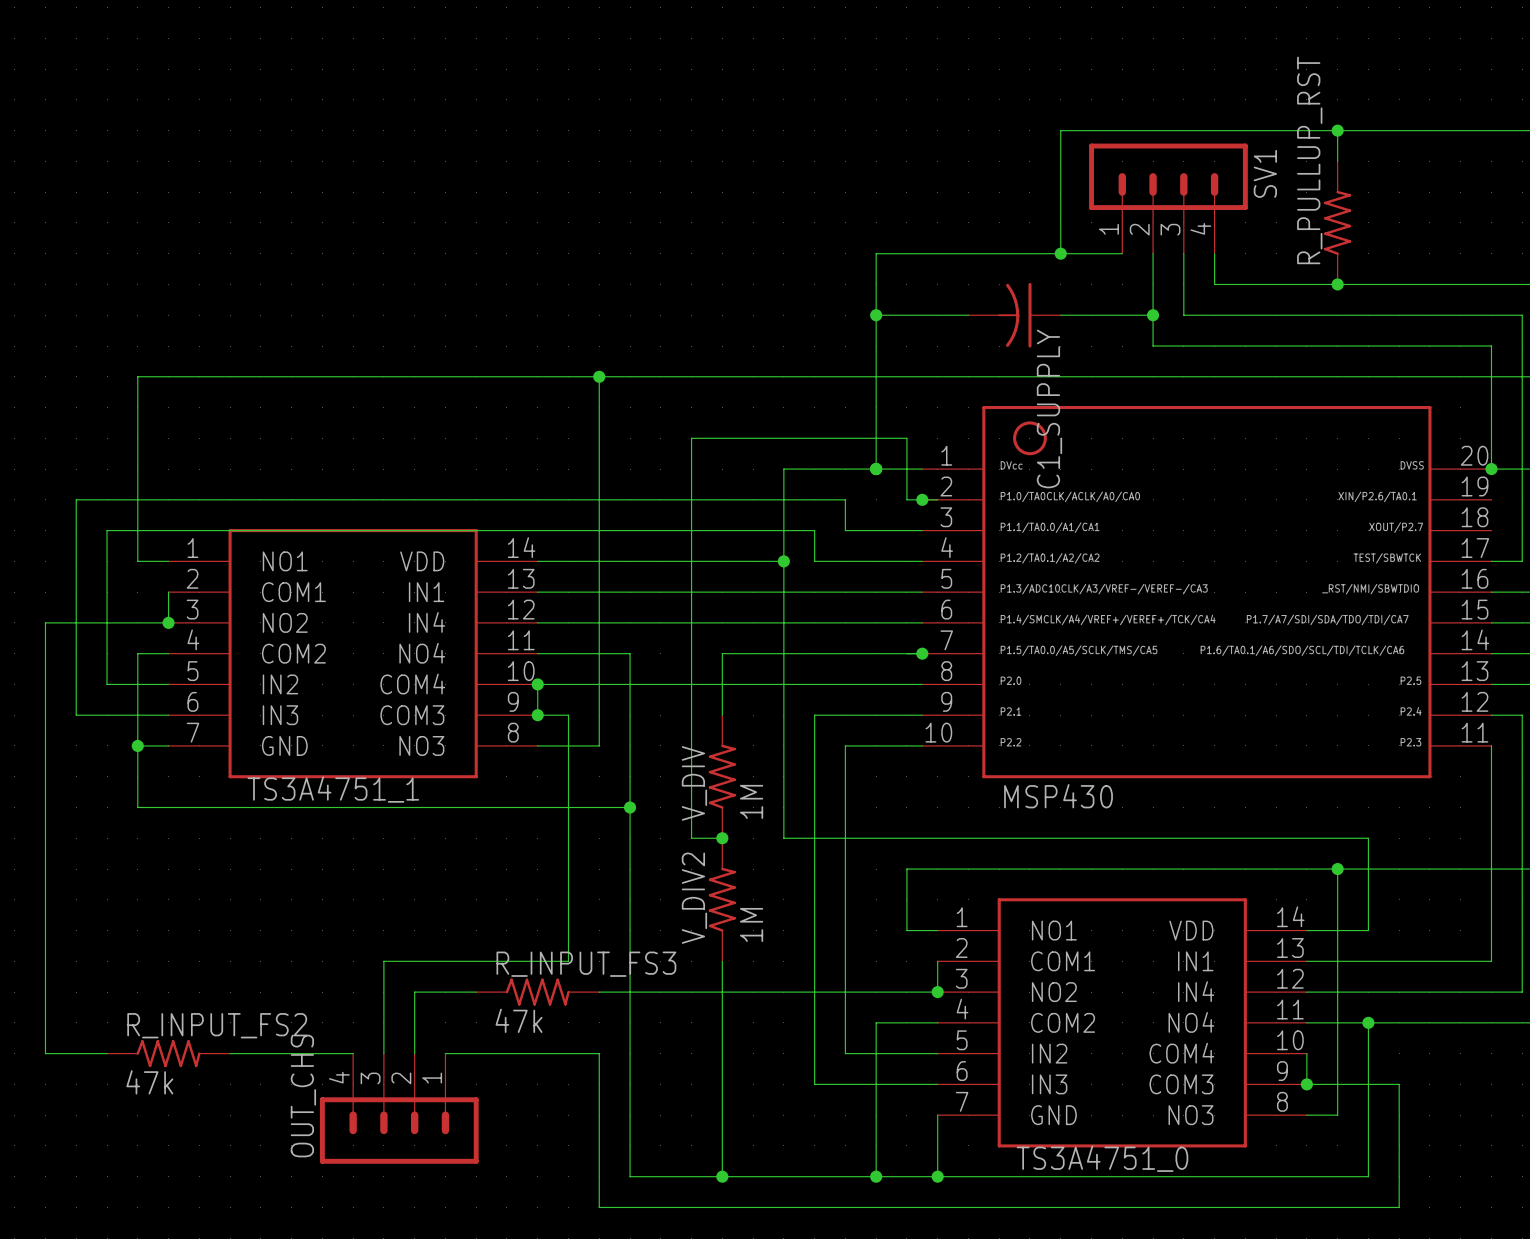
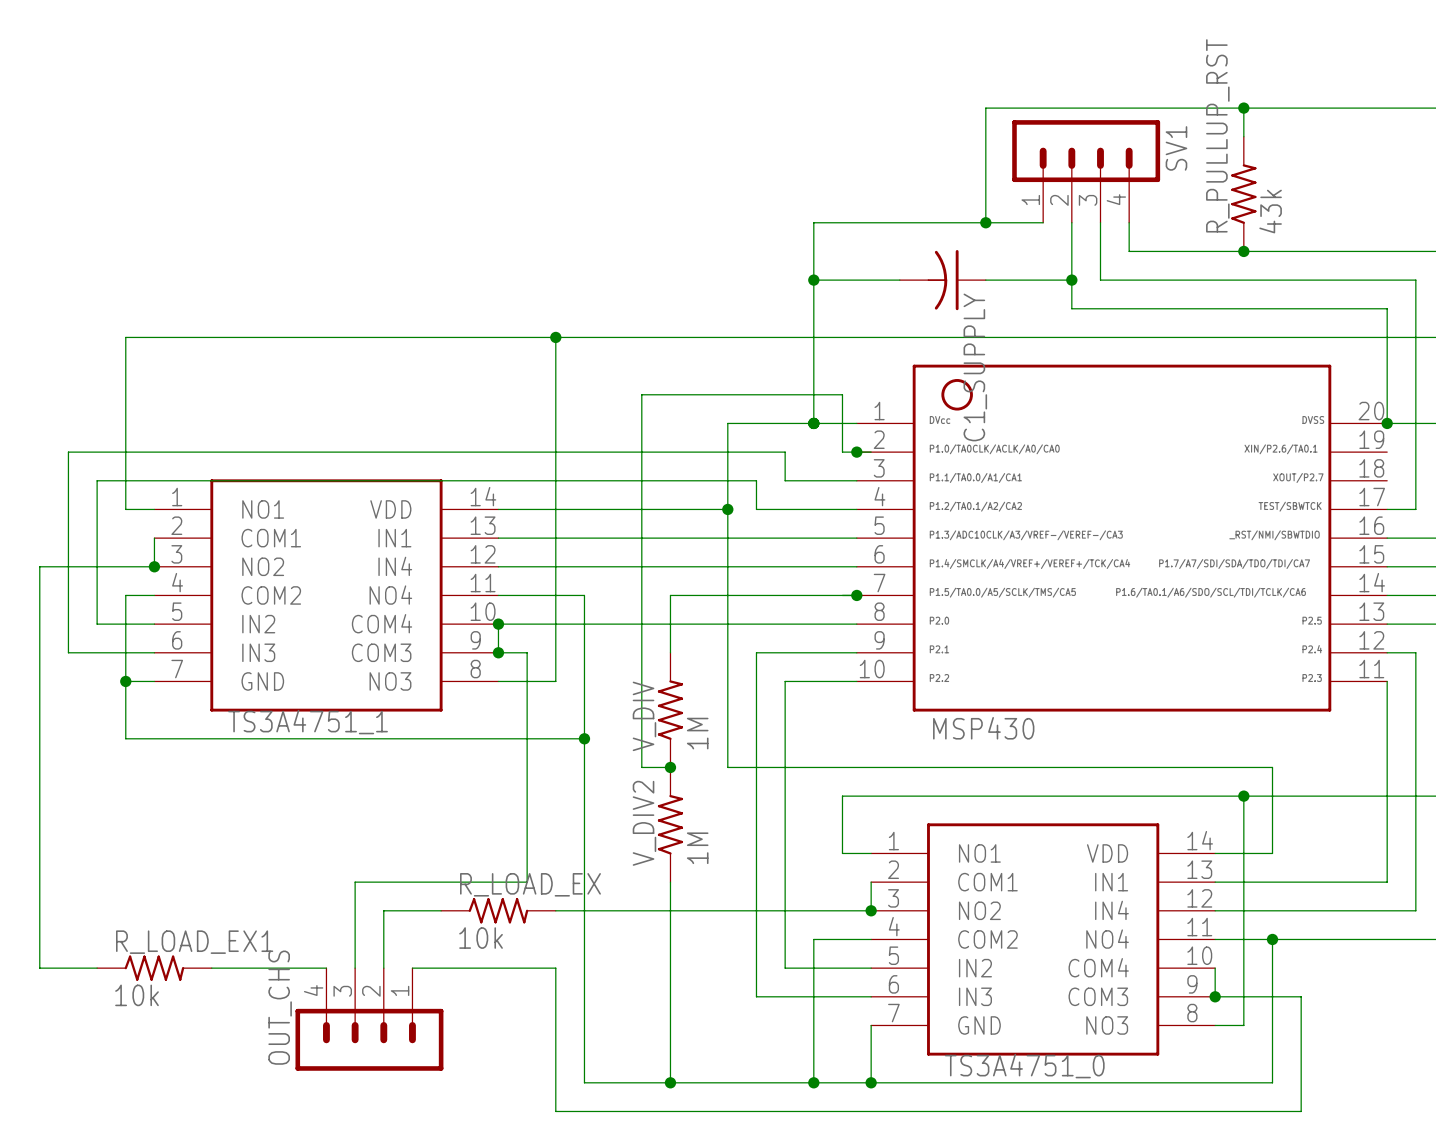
R_PULLUP_RST value: none -> 43k (1270, 211)
R_INPUT_FS3 name: R_INPUT_FS3 (586, 964) -> R_LOAD_EX (530, 884)
R_INPUT_FS3 value: 47k (519, 1020) -> 10k (481, 938)
R_INPUT_FS2 name: R_INPUT_FS2 (217, 1025) -> R_LOAD_EX1 (194, 942)
R_INPUT_FS2 value: 47k (149, 1082) -> 10k (137, 995)

